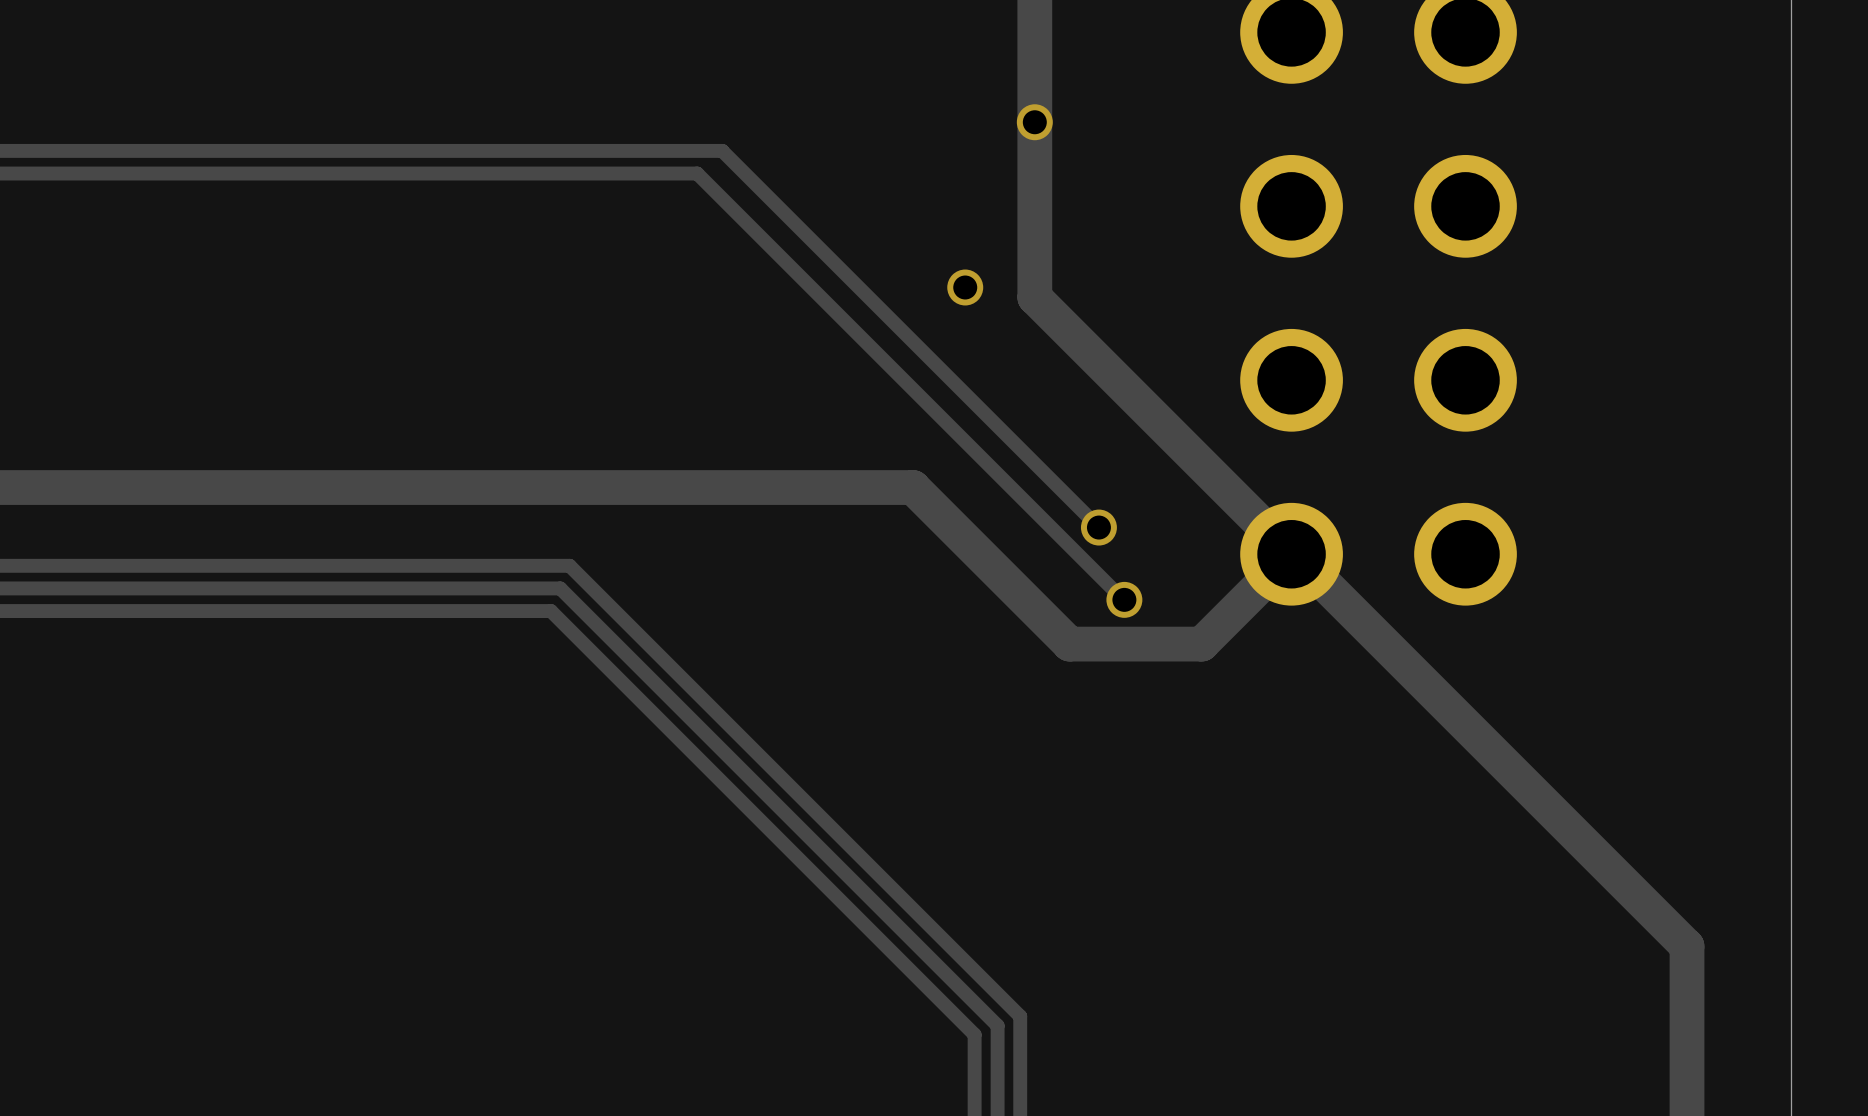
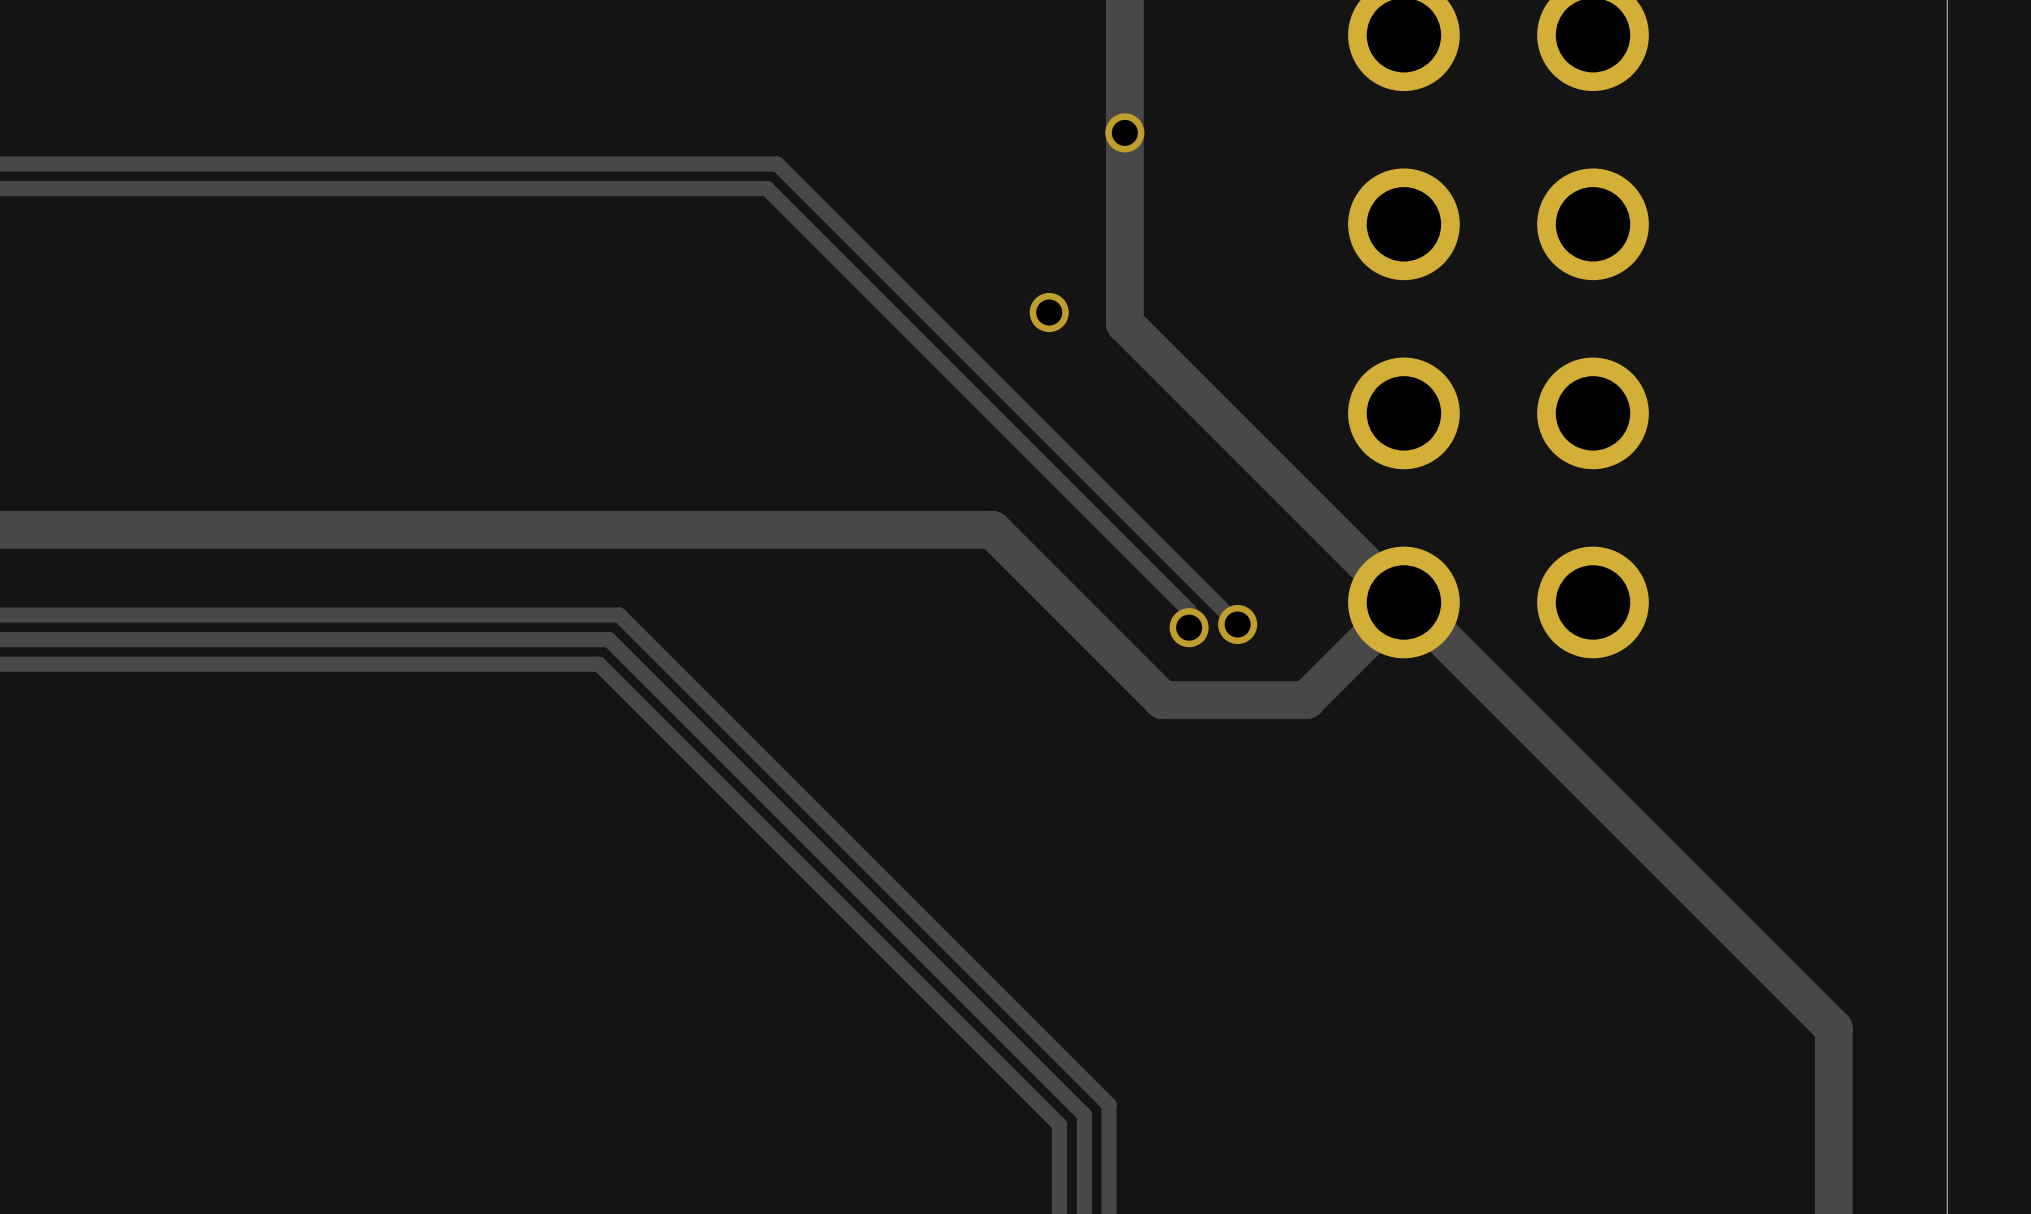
track: (714, 150) (722, 150) (1098, 527) -> (777, 164) (1237, 624)
track: (697, 173) (1123, 599) -> (757, 188) (767, 188) (1189, 610) (1189, 627)
via: (1098, 527) -> none
via: none -> (1237, 624)
via: none -> (1189, 627)
via: (1124, 599) -> none

